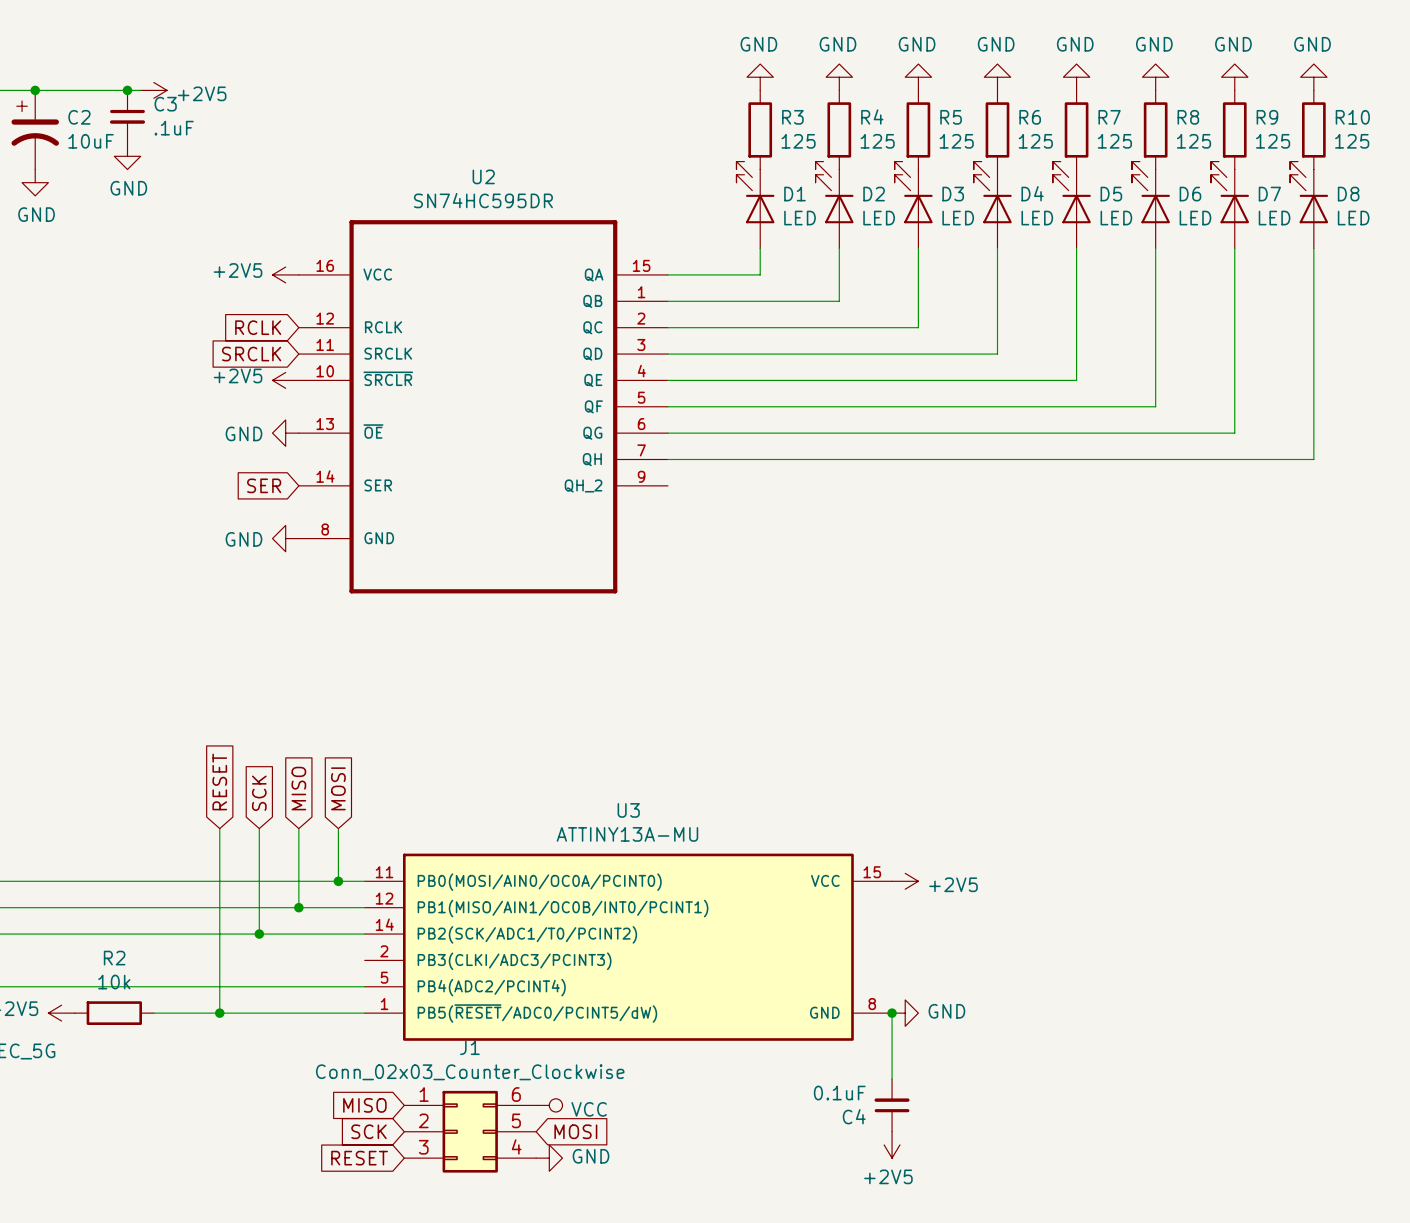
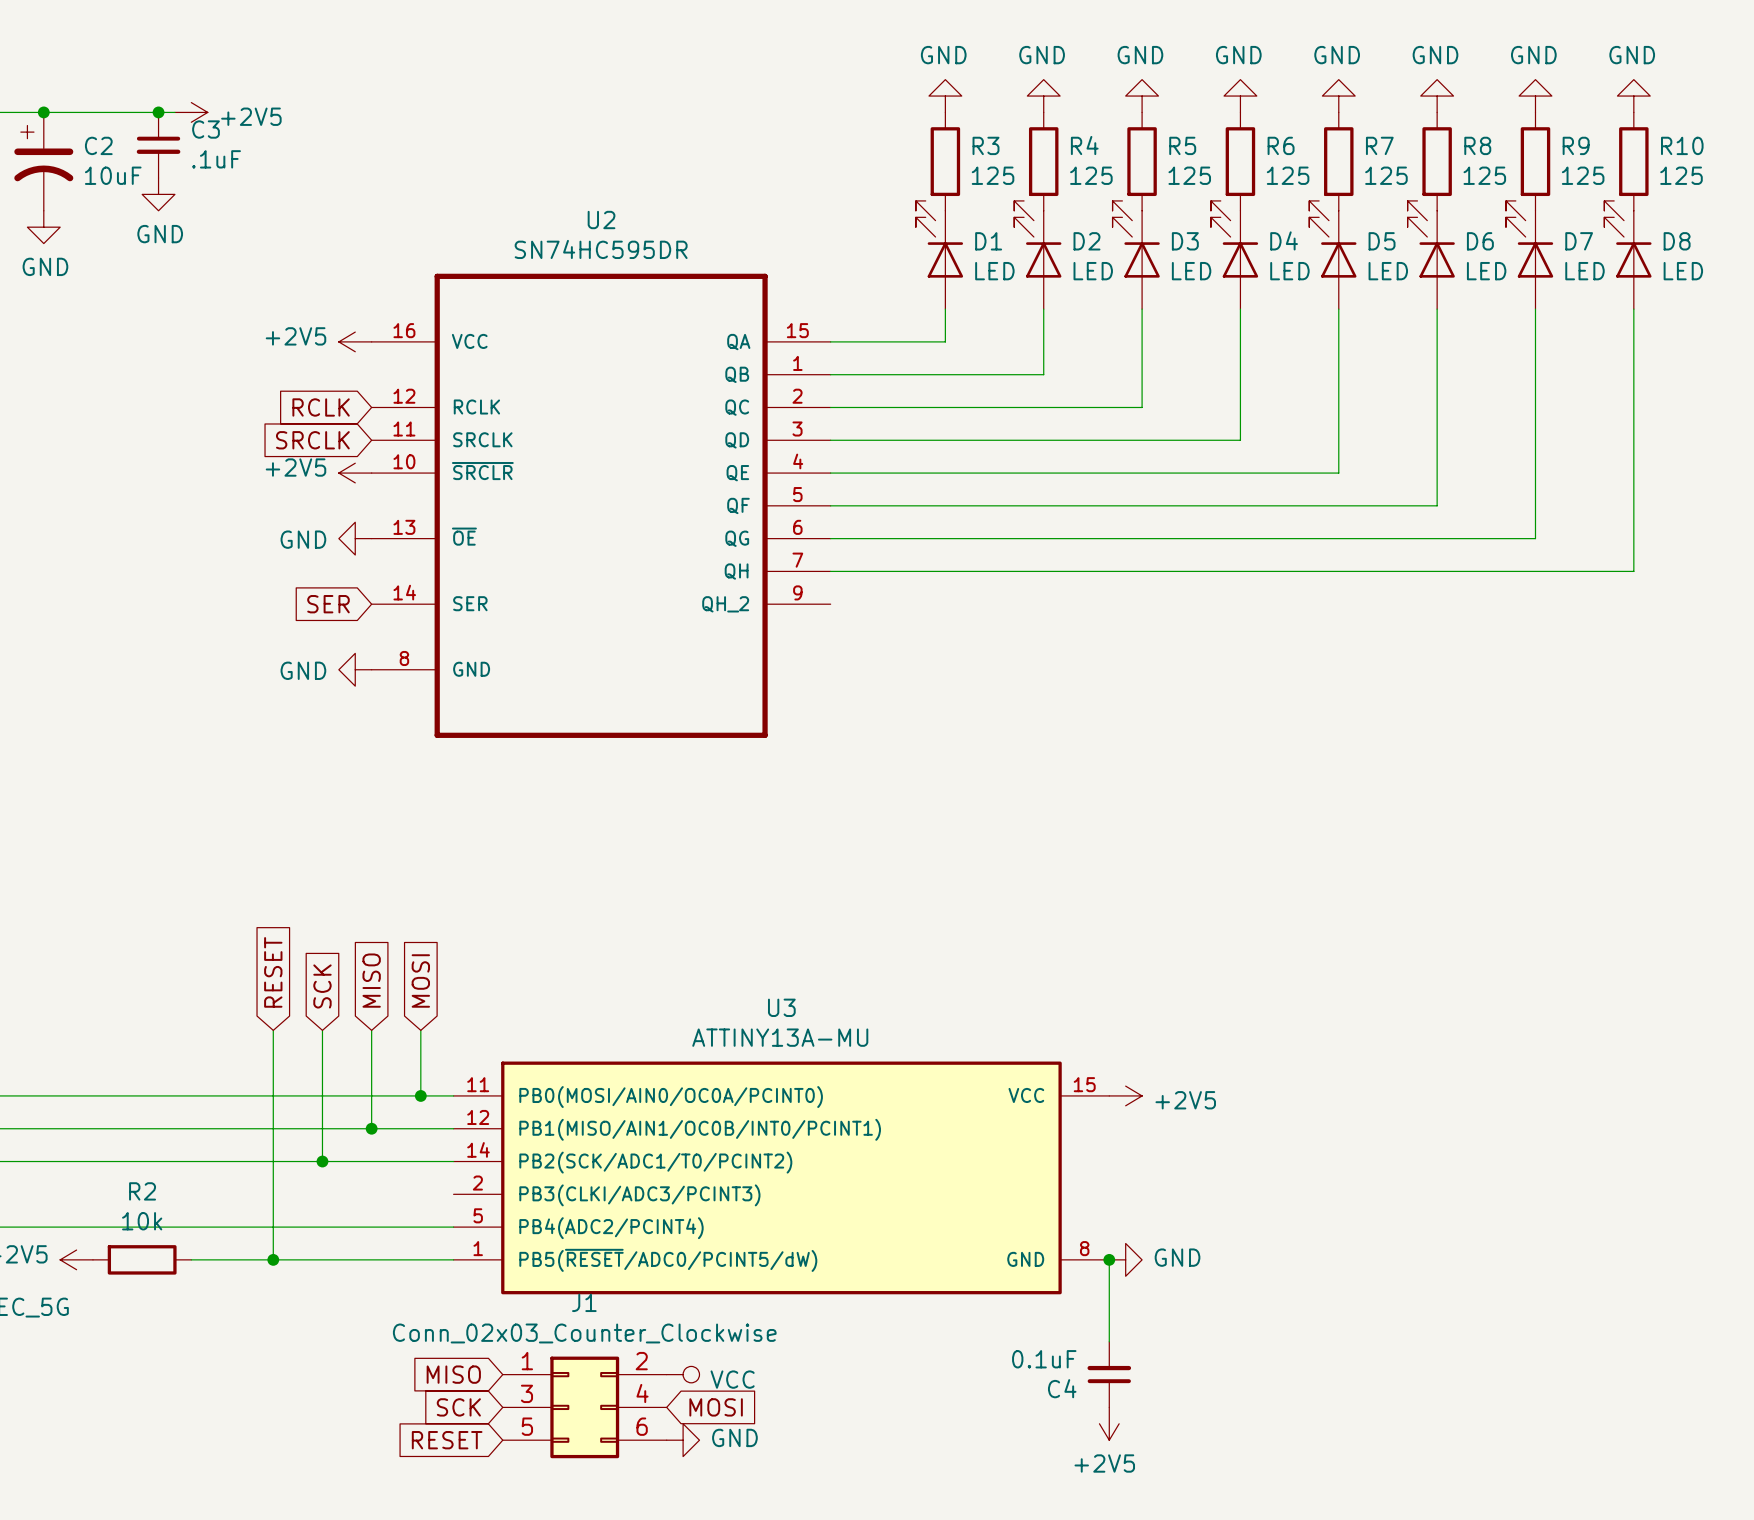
J1 pin number: 6 (516, 1094) -> 2 (641, 1361)
J1 pin number: 2 (423, 1120) -> 3 (526, 1393)
J1 pin number: 5 (516, 1120) -> 4 (642, 1393)
J1 pin number: 4 (516, 1146) -> 6 (642, 1426)
J1 pin number: 3 (423, 1147) -> 5 (527, 1426)

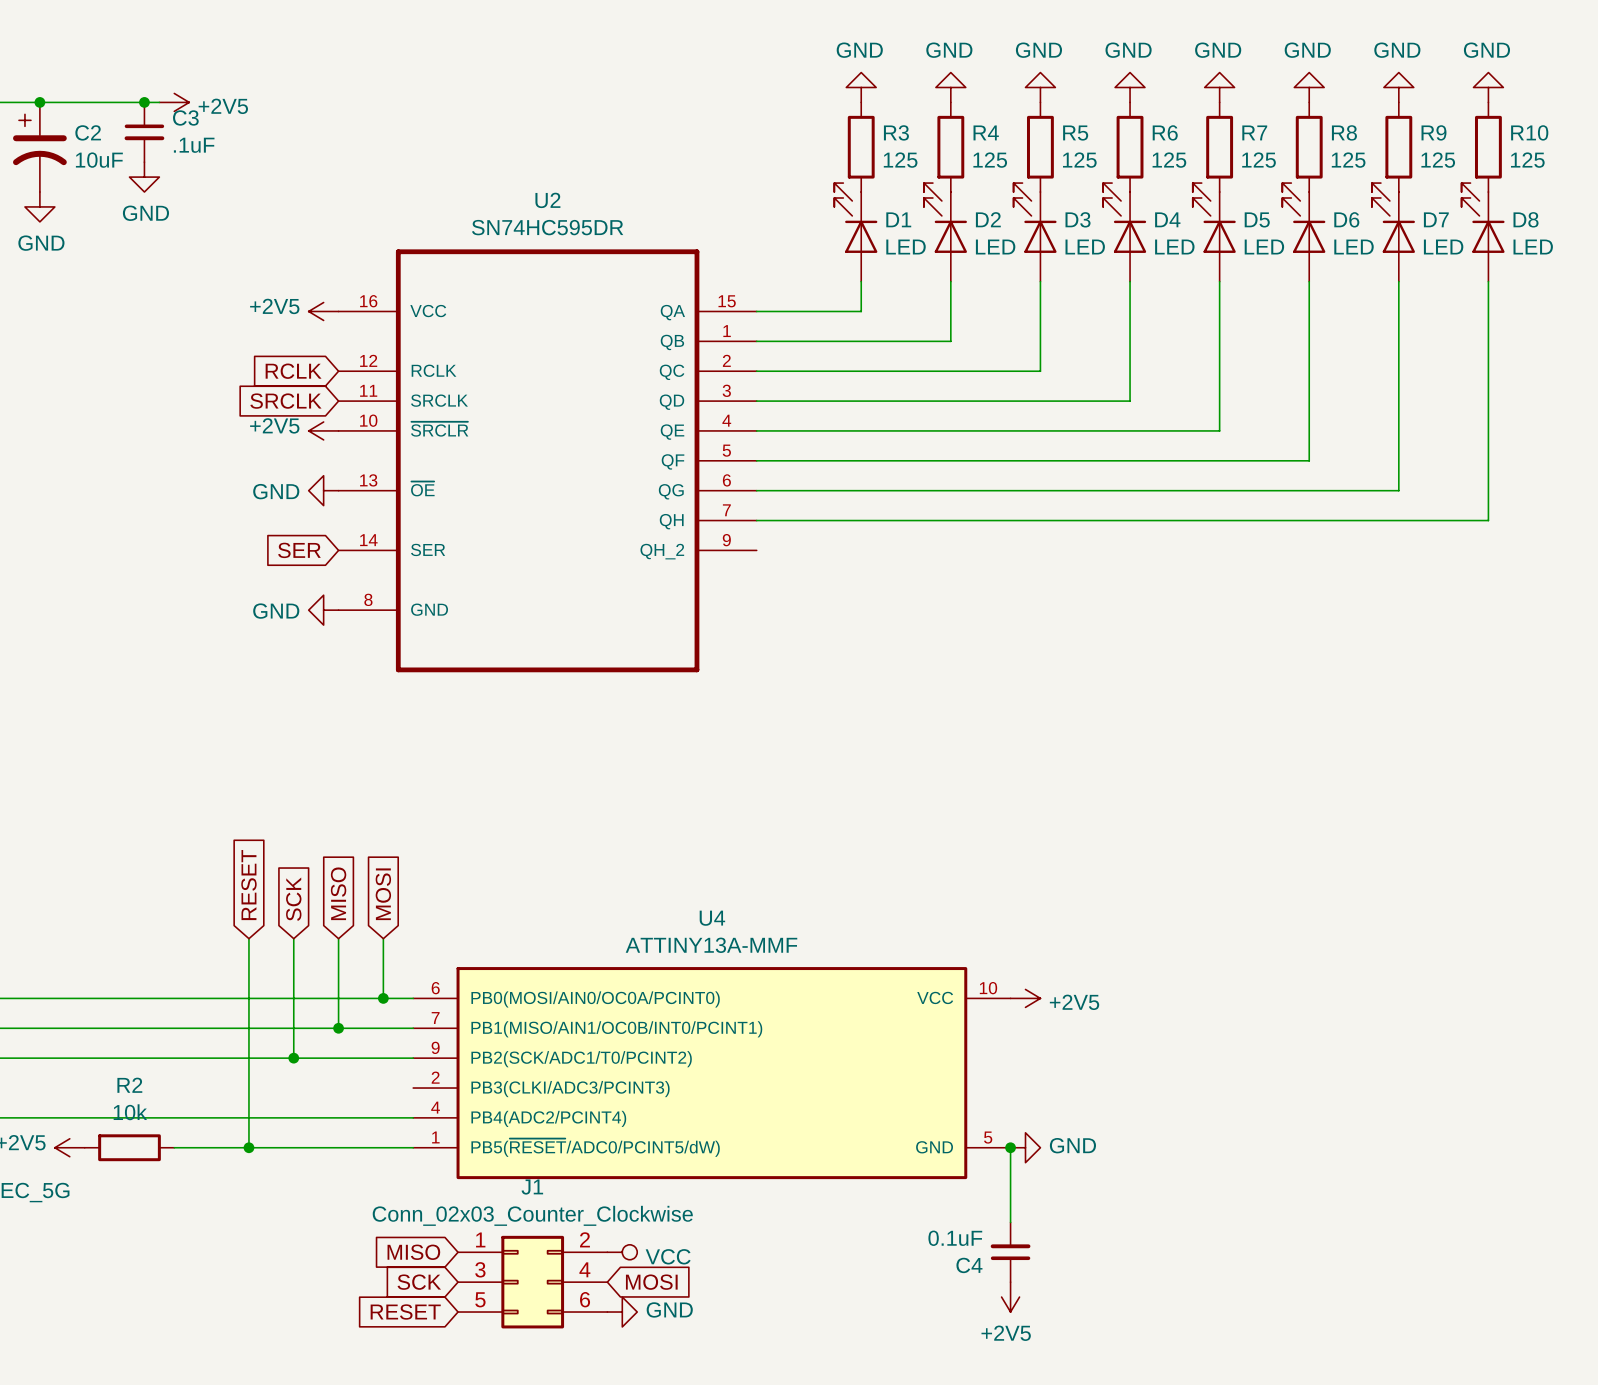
U3 name: U3 (781, 1007) -> U4 (712, 918)
U3 value: ATTINY13A-MU (780, 1037) -> ATTINY13A-MMF (711, 945)
U3 pin number: 11 (478, 1084) -> 6 (435, 988)
U3 pin number: 15 (1084, 1084) -> 10 (988, 988)
U3 pin number: 12 (478, 1117) -> 7 (435, 1018)
U3 pin number: 14 (478, 1149) -> 9 (435, 1047)
U3 pin number: 5 (478, 1215) -> 4 (435, 1107)
U3 pin number: 8 (1084, 1248) -> 5 (988, 1137)

